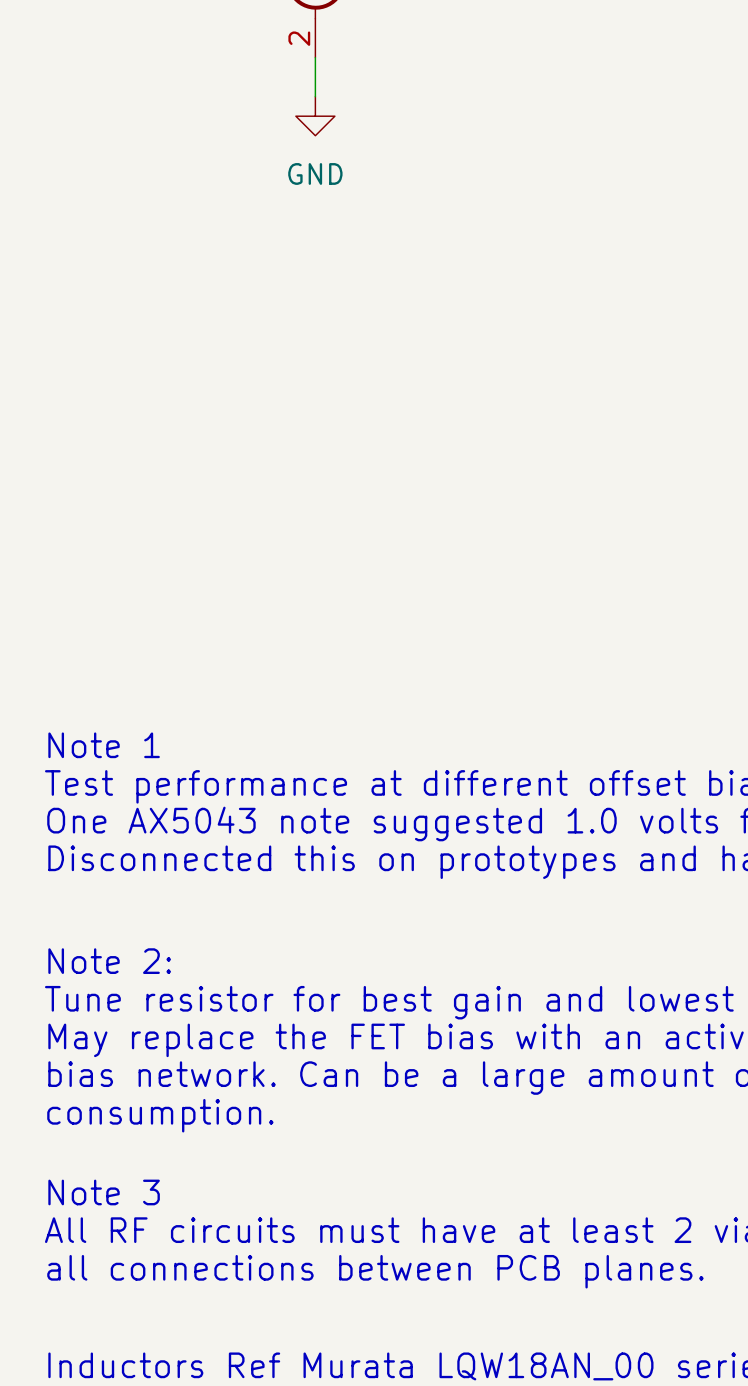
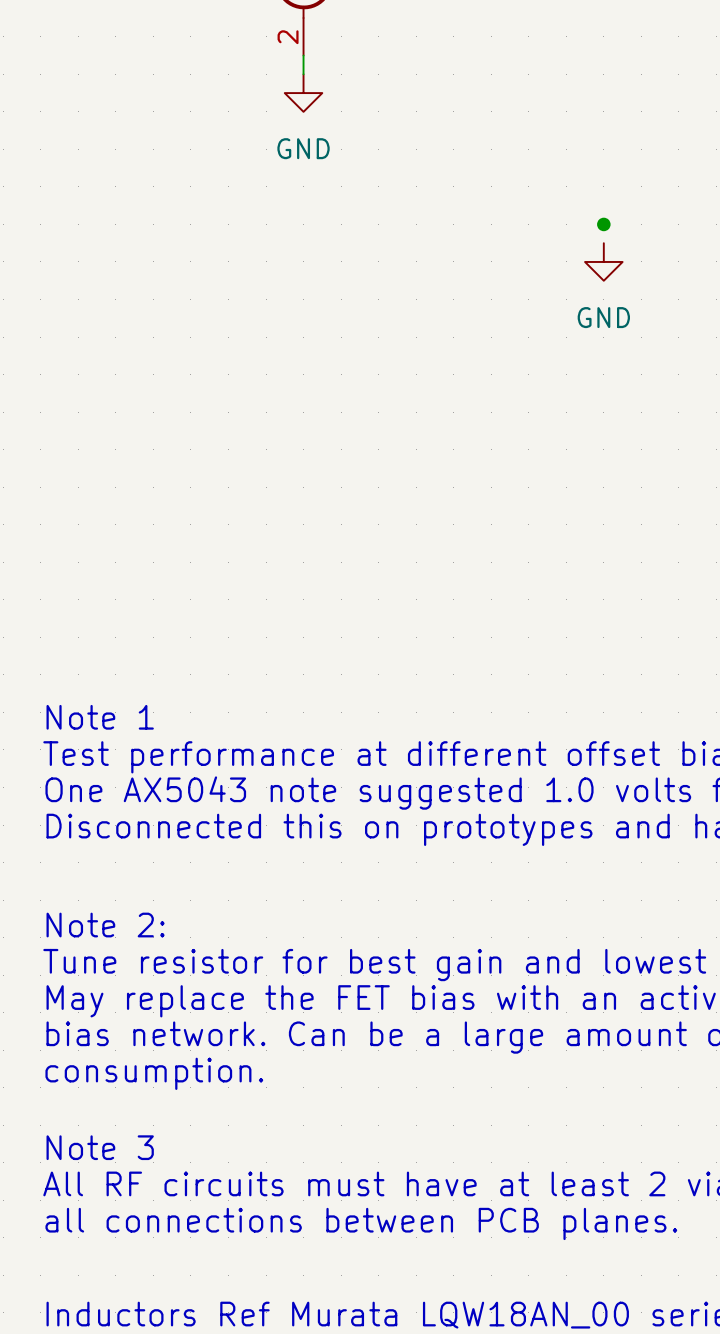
power symbol position: GND (315, 116) -> GND (303, 93)
junction: none -> (603, 224)
power symbol: none -> GND (603, 261)

